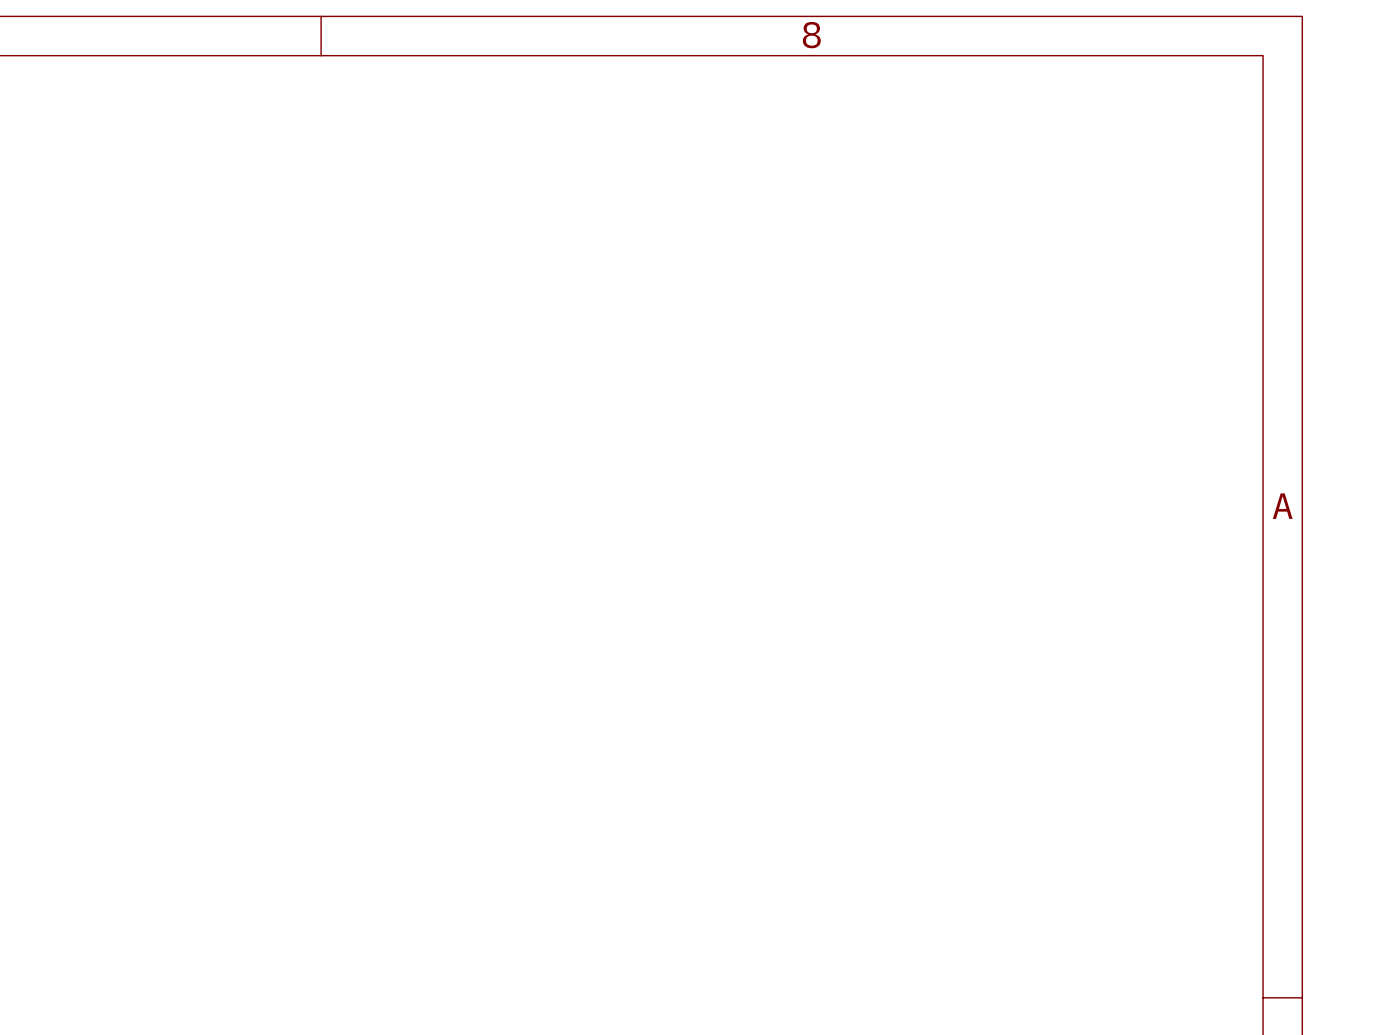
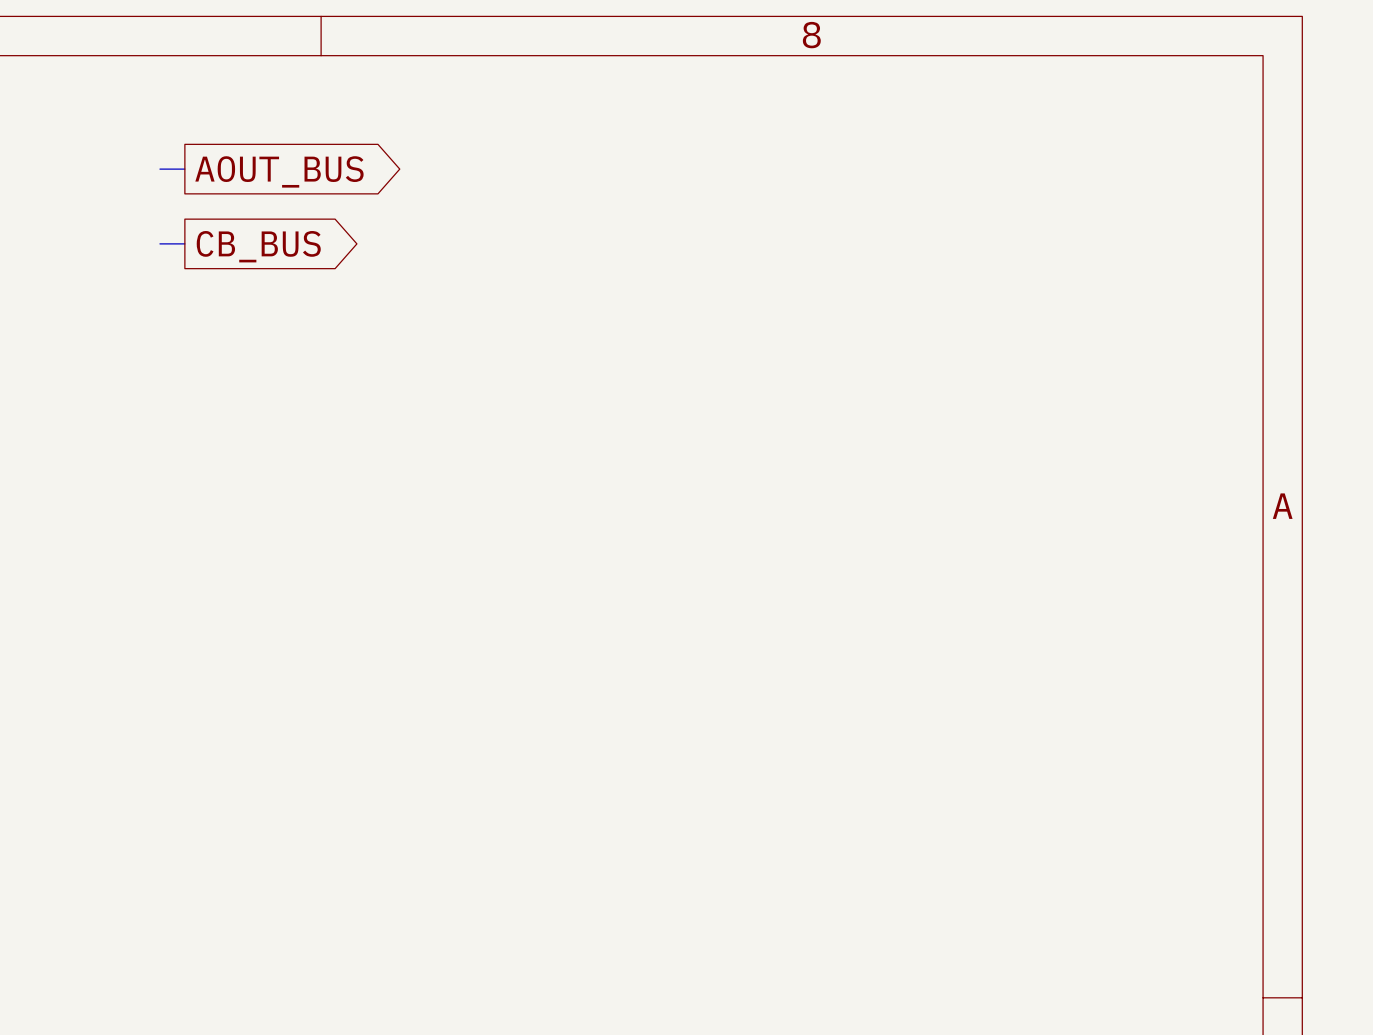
bus: none -> (159, 169) (184, 169)
global label: none -> AOUT_BUS (279, 171)
bus: none -> (159, 243) (184, 243)
global label: none -> CB_BUS (258, 246)

